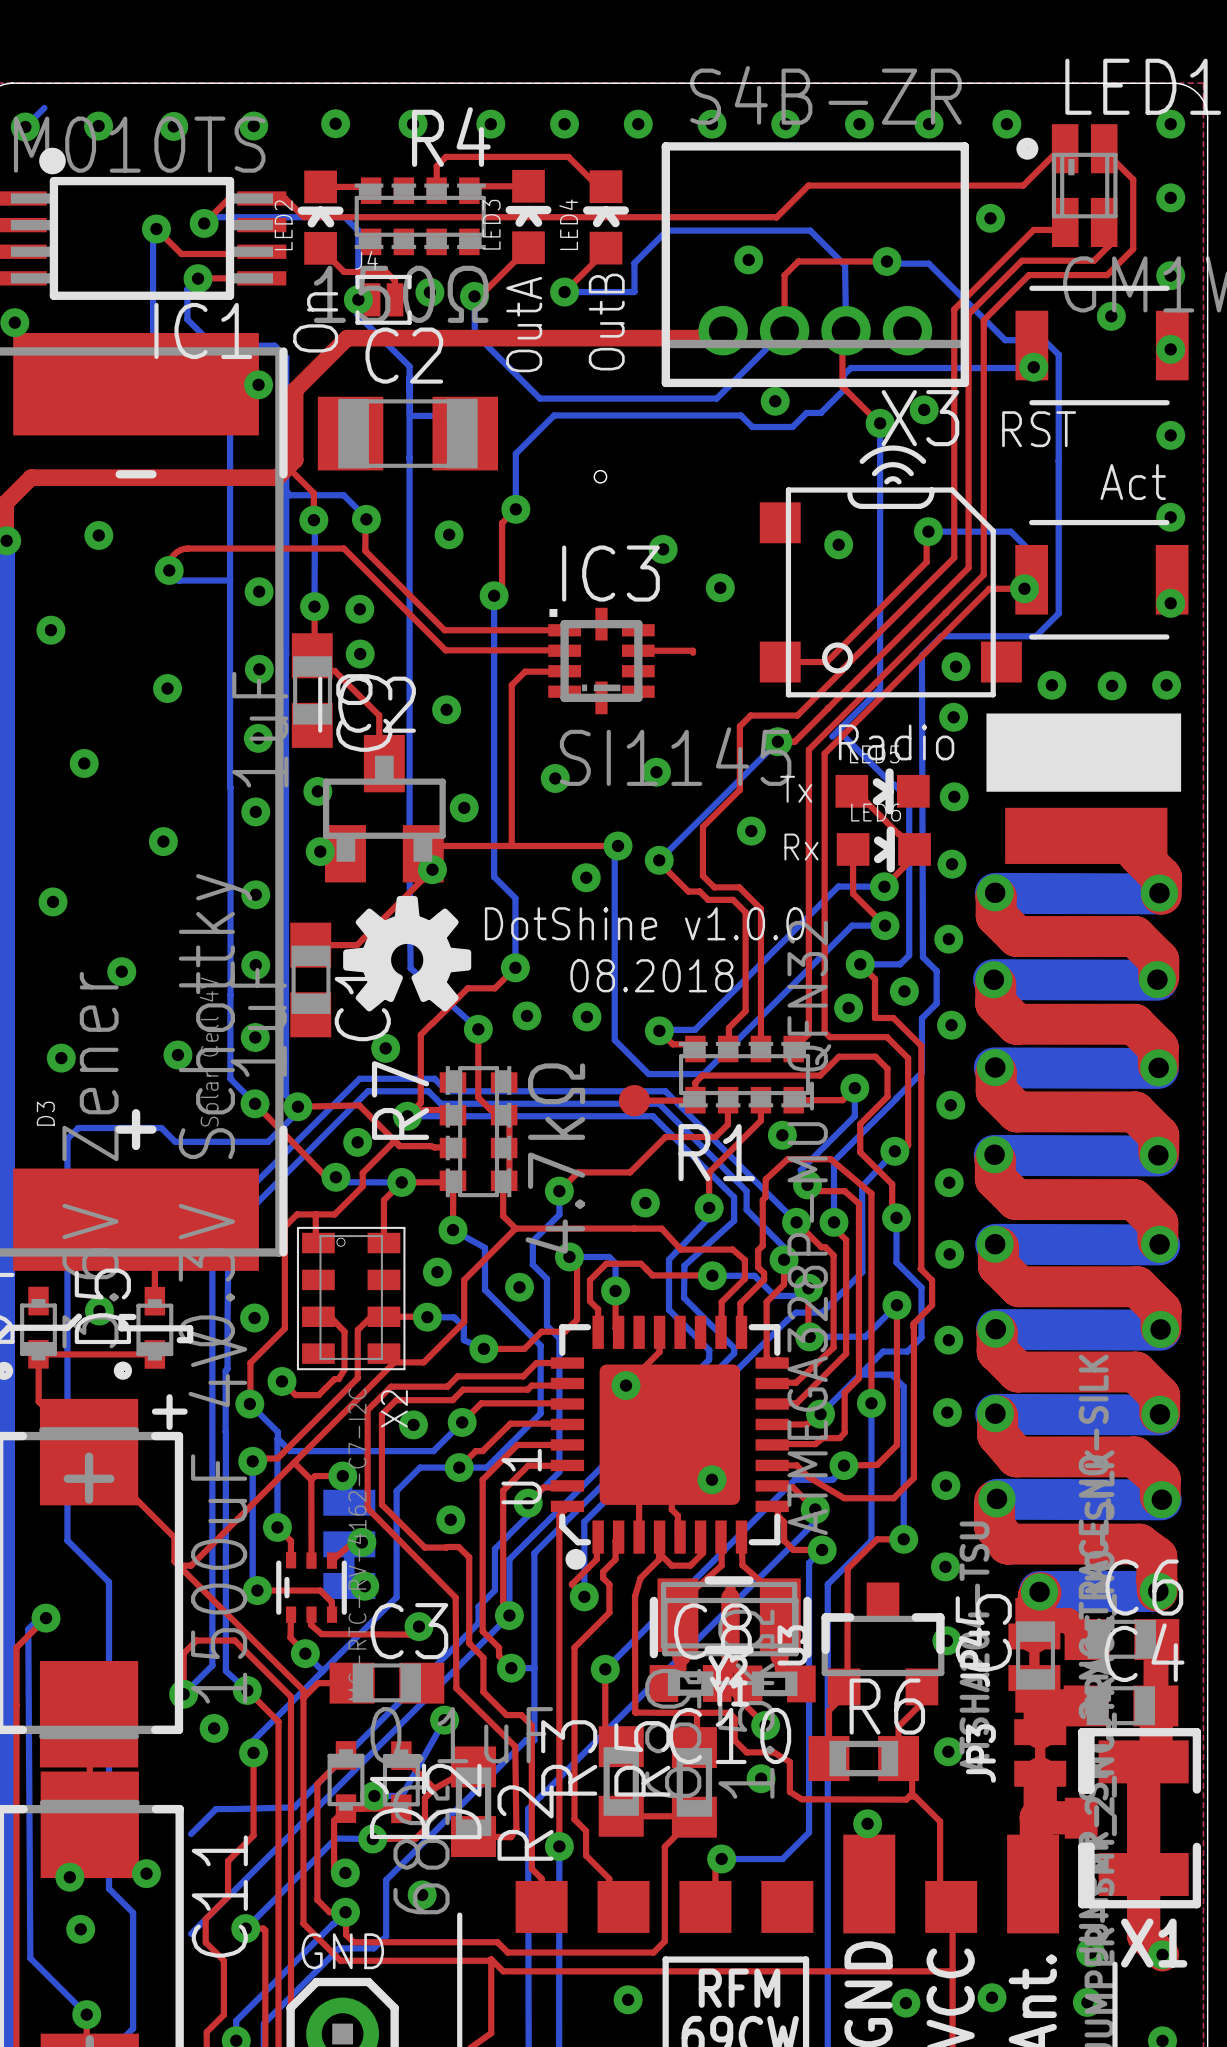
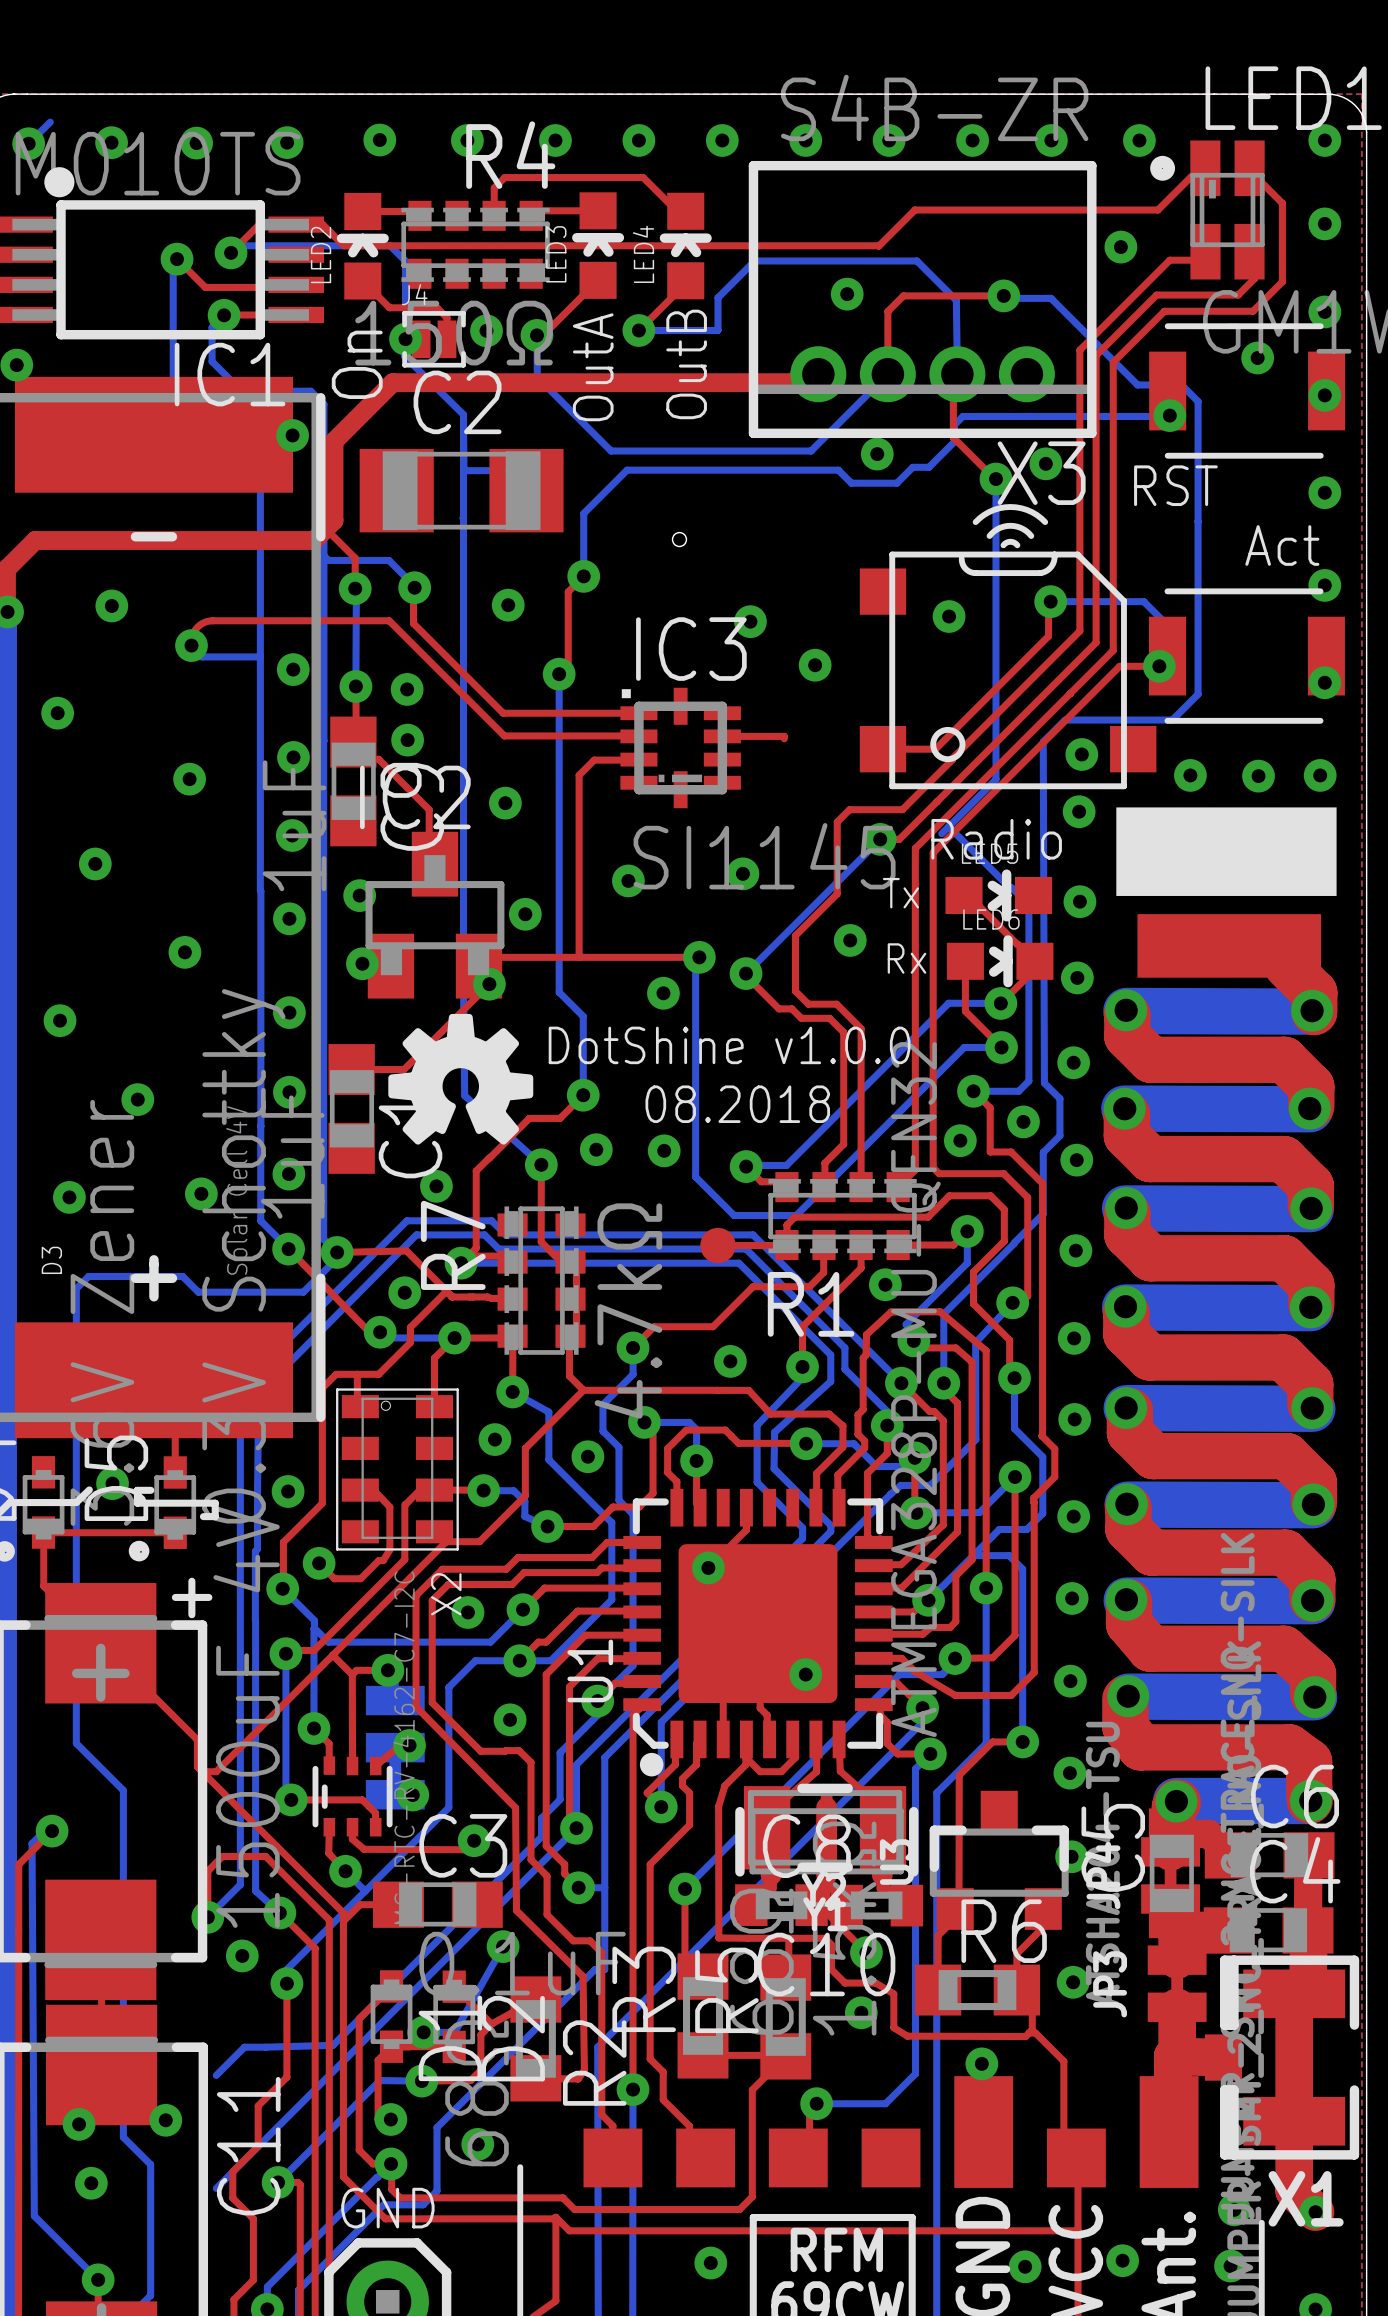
text position: Radio (896, 742) -> Radio (996, 839)

